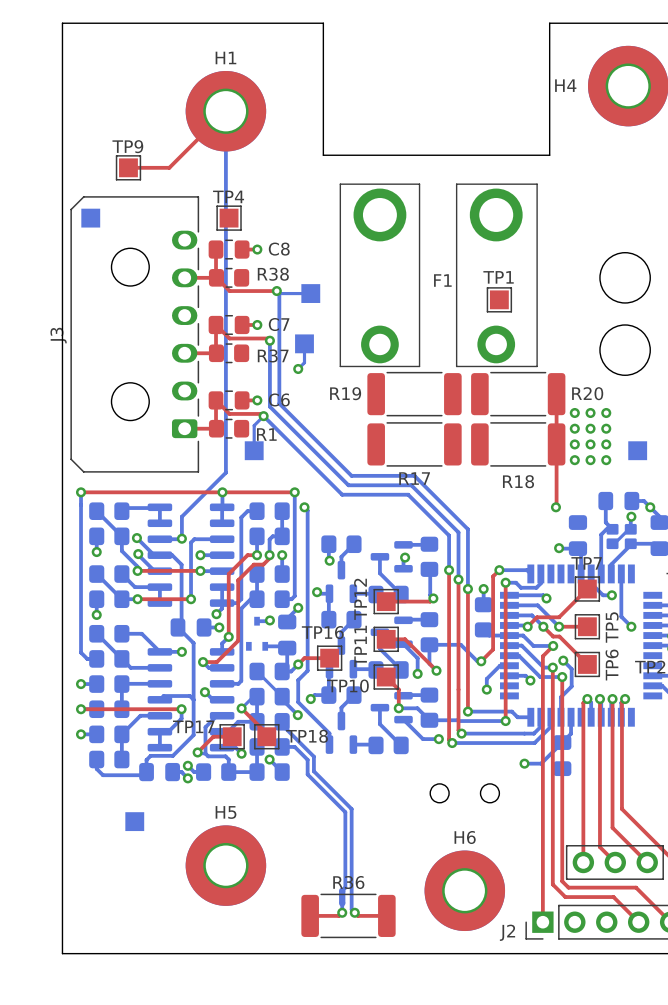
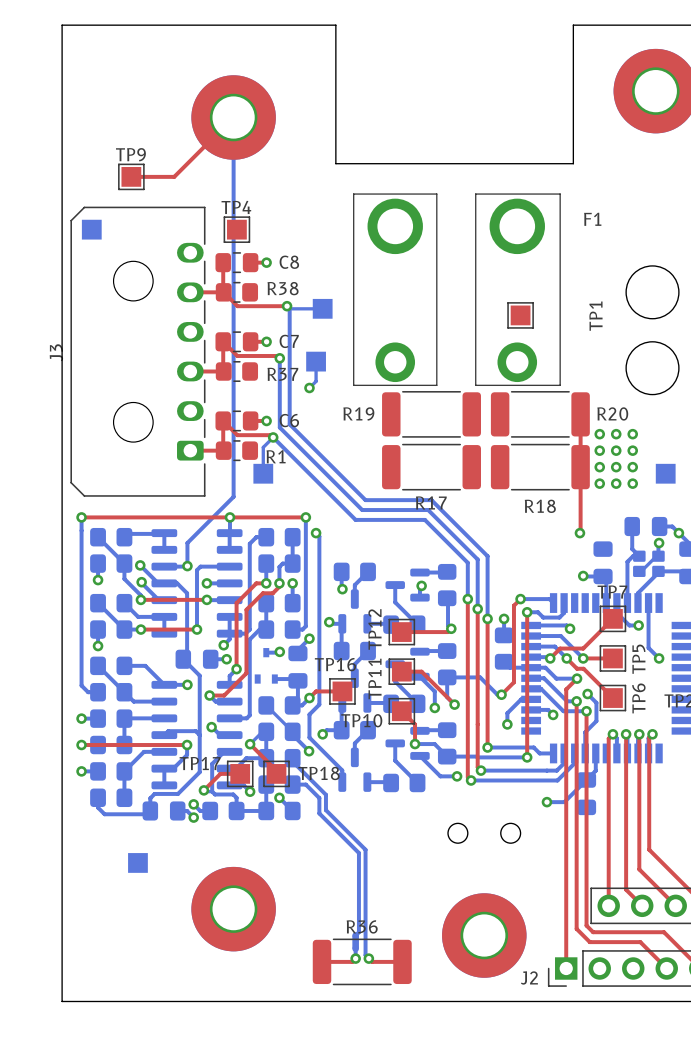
H1 name: H1 (225, 57) -> none
H4 name: H4 (565, 85) -> none
TP1 name rotation: 0° (498, 277) -> 90° counterclockwise (595, 316)
TP1 name position: TP1 (498, 277) -> TP1 (595, 316)
F1 name position: F1 (442, 280) -> F1 (592, 219)
H5 name: H5 (226, 812) -> none
H6 name: H6 (465, 837) -> none

